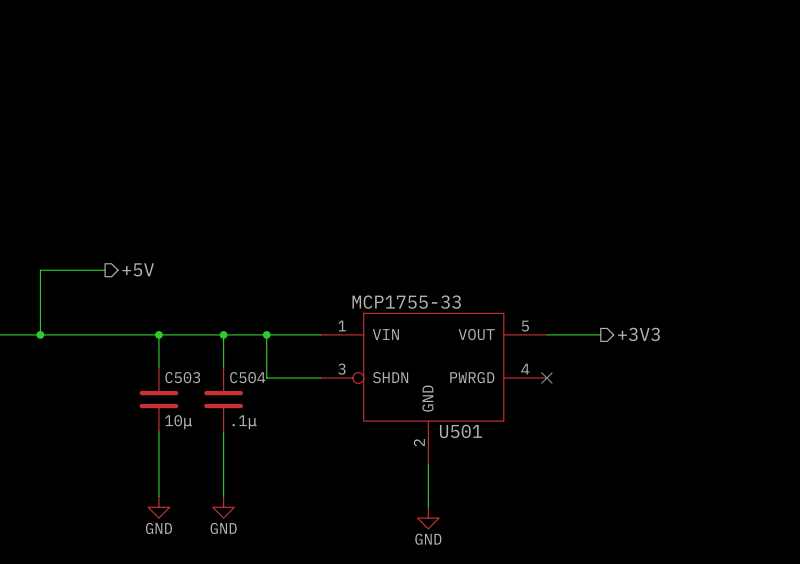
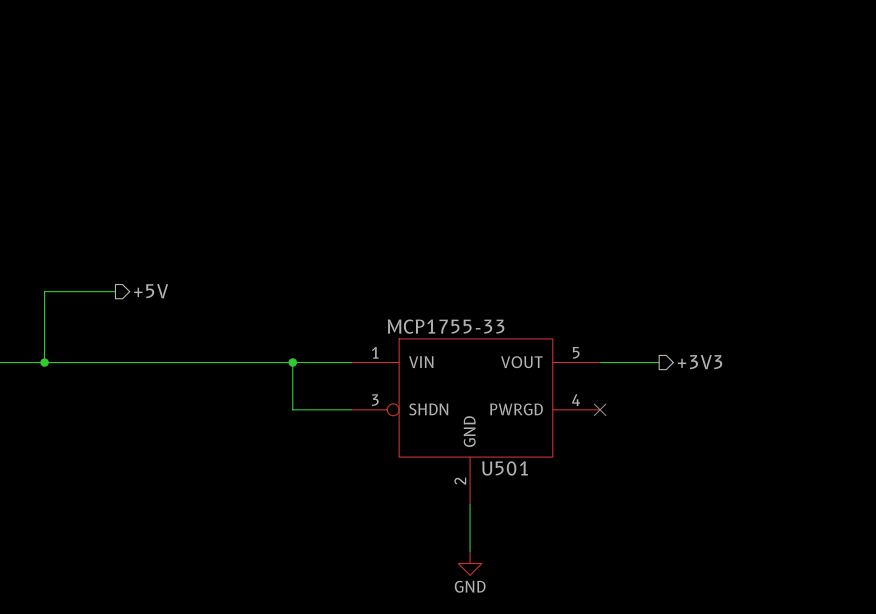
wire: (158, 334) (158, 367) -> none
junction: (158, 334) -> none
wire: (223, 334) (223, 367) -> none
junction: (223, 334) -> none
C503: 10μ (158, 399) -> none
C504: .1μ (223, 399) -> none
wire: (158, 431) (158, 496) -> none
wire: (223, 431) (223, 496) -> none
power symbol: GND (158, 507) -> none
power symbol: GND (223, 507) -> none

